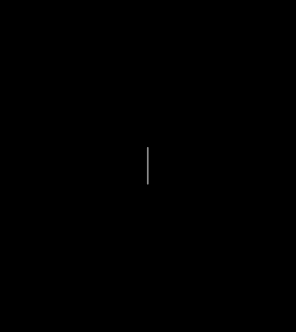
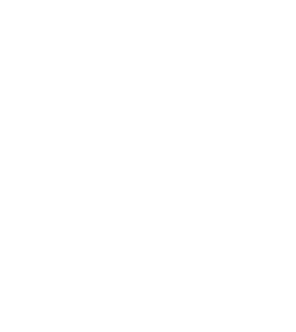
line: (147, 147) (147, 183) -> none

